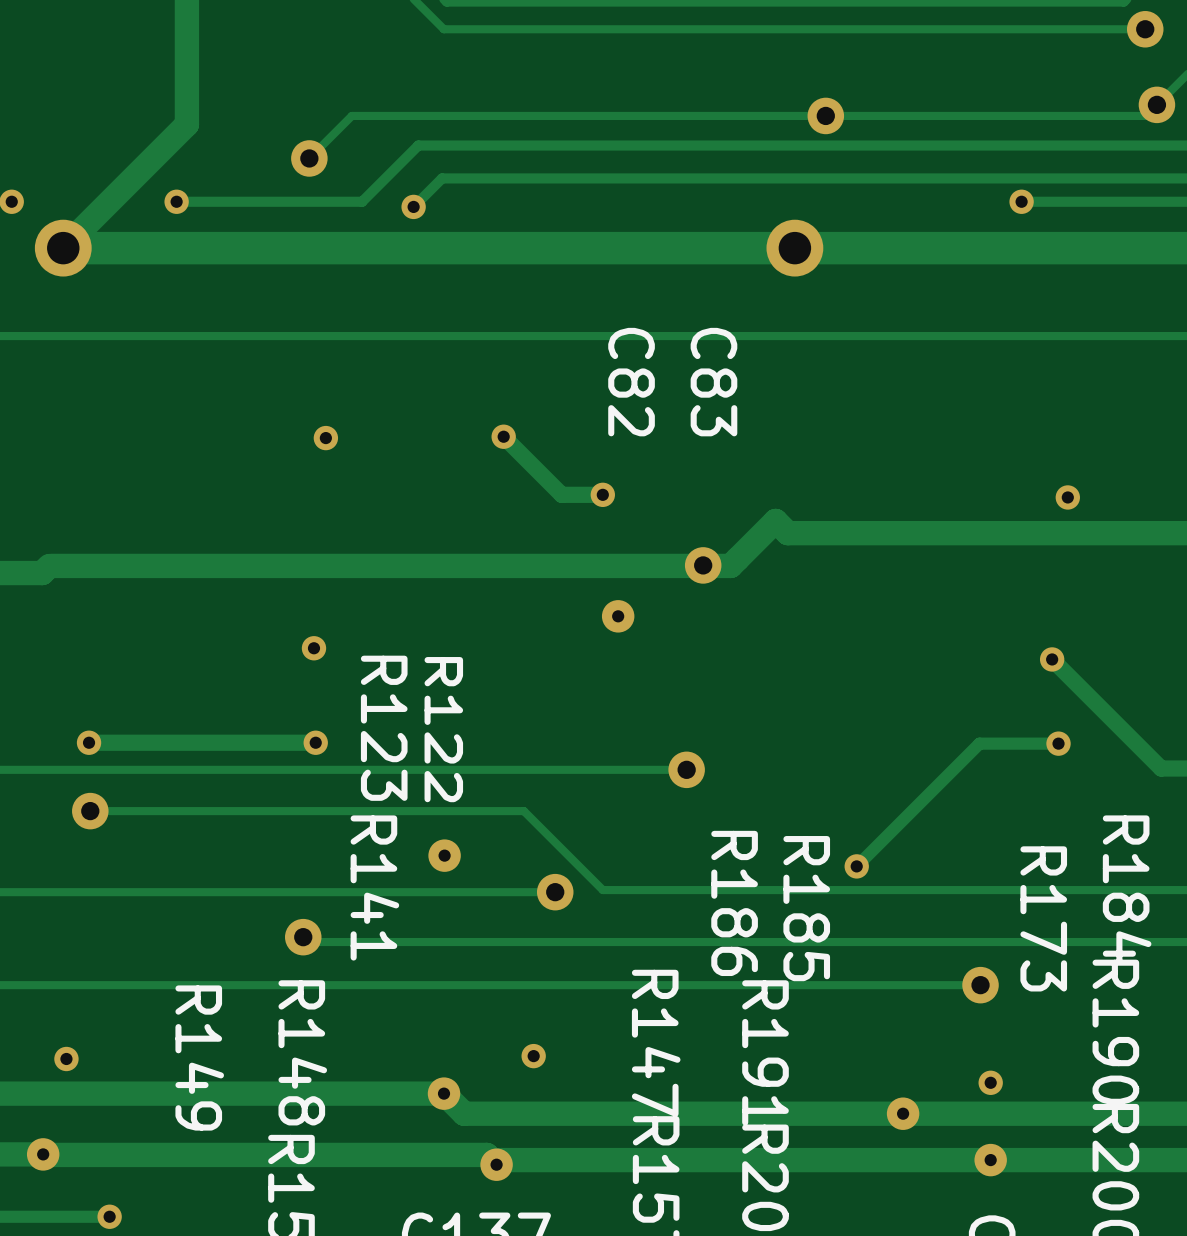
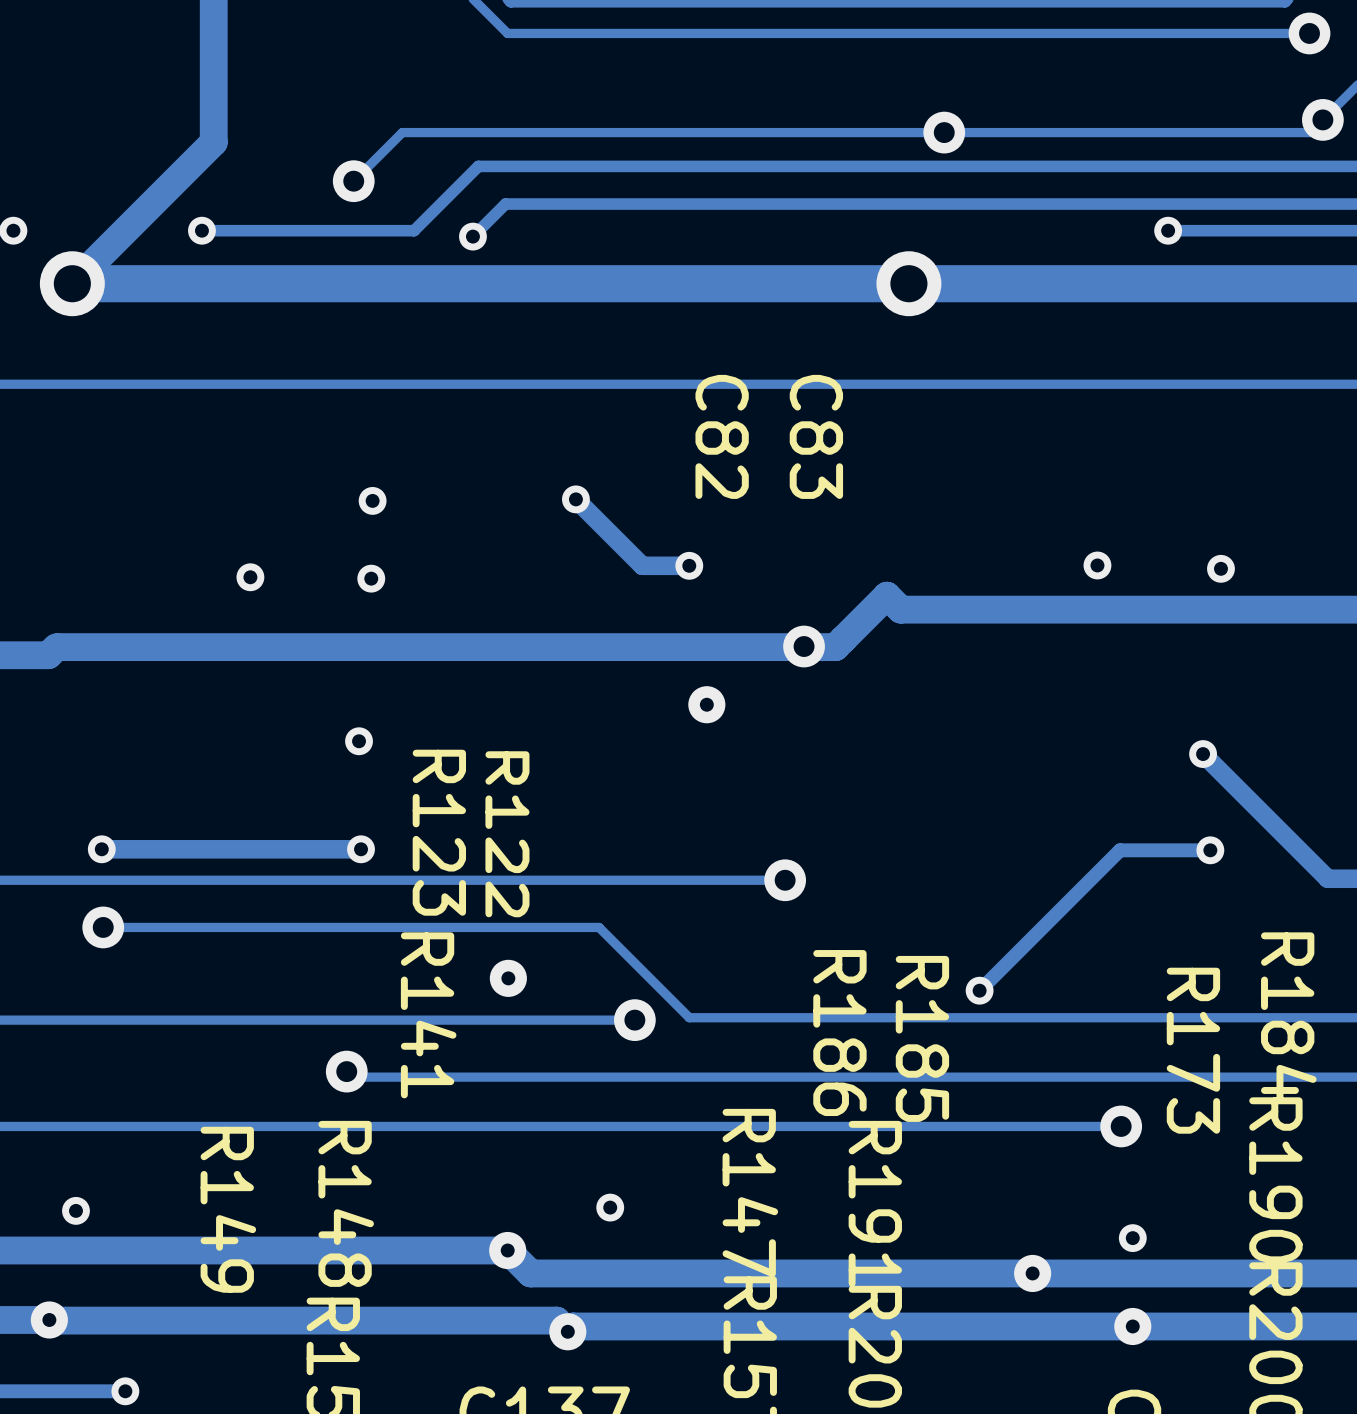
via: none -> (1097, 565)
via: none -> (250, 577)
via: none -> (371, 578)

